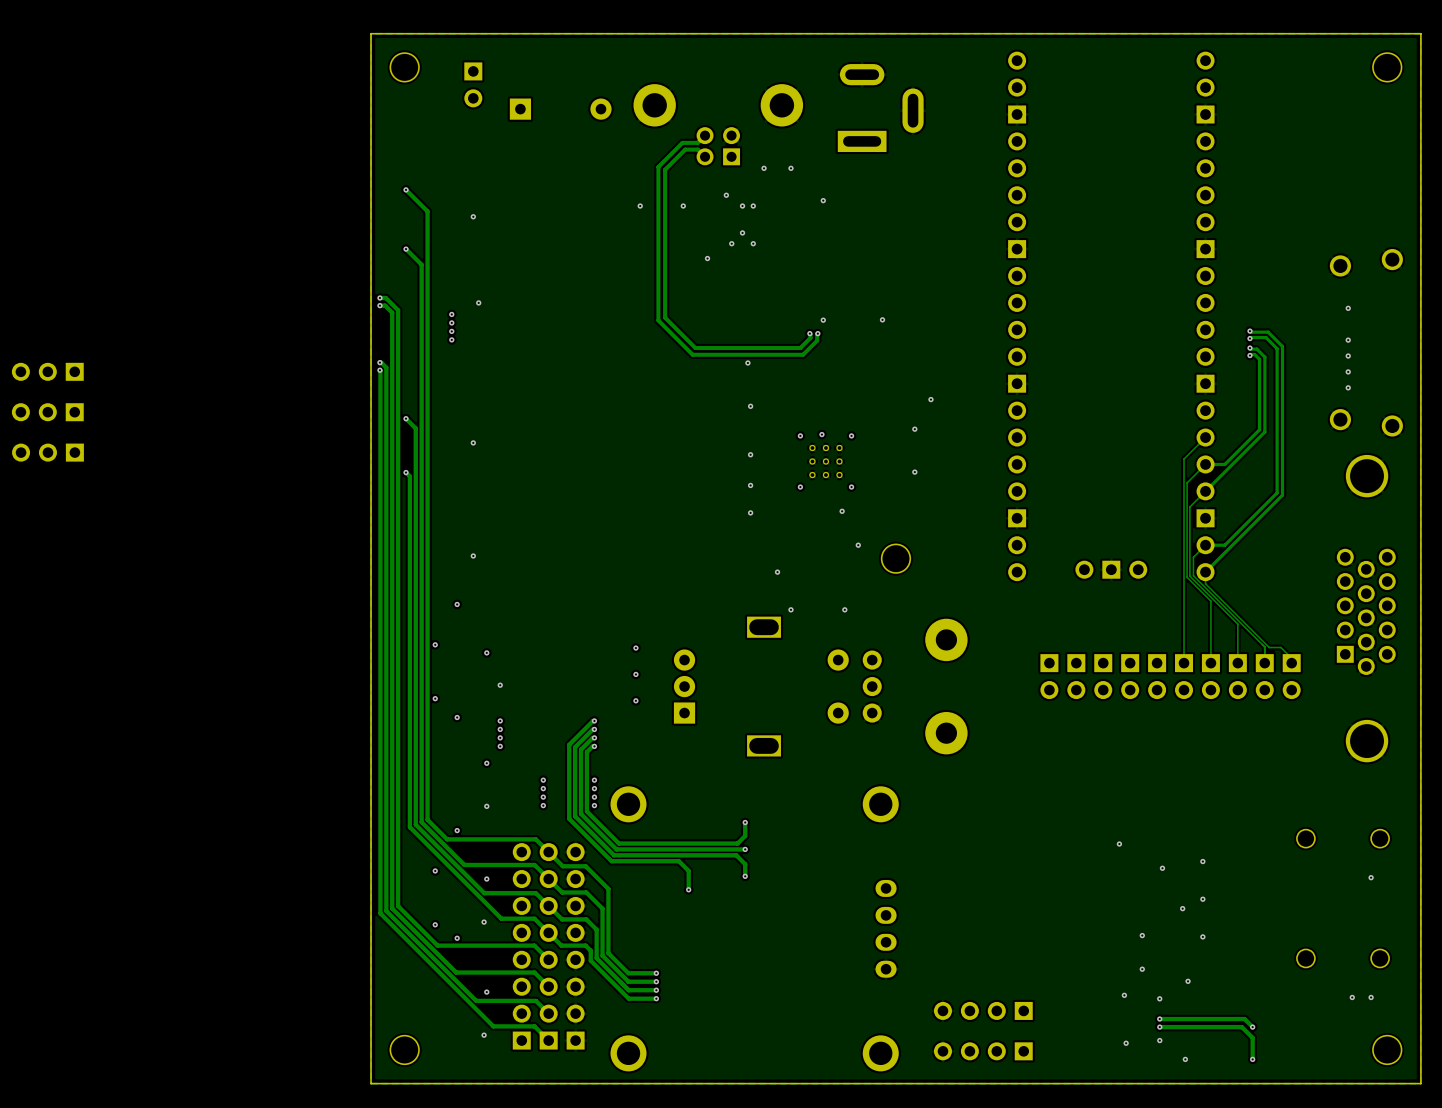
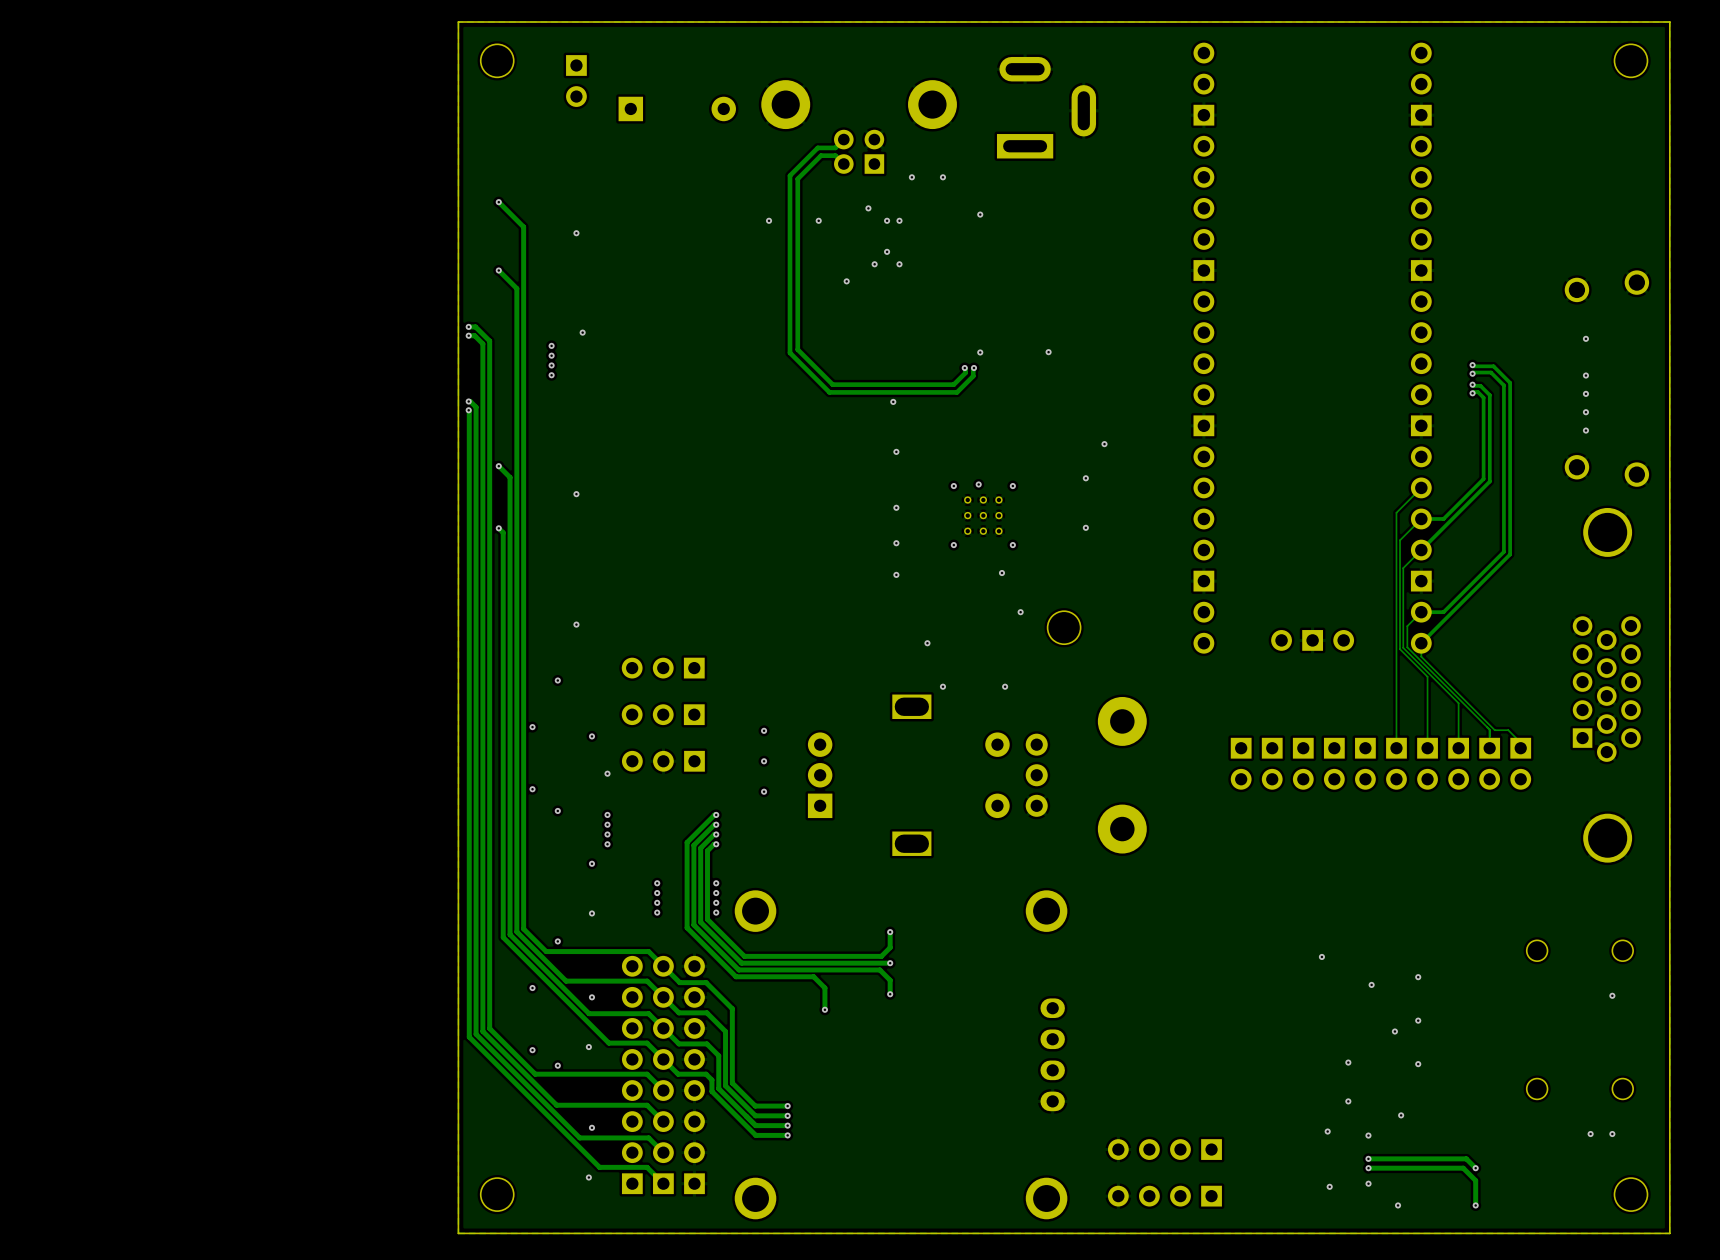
part: (47, 371) -> none
part: (47, 412) -> none
part: (47, 452) -> none
part: none -> (663, 668)
part: none -> (663, 714)
part: none -> (663, 761)

